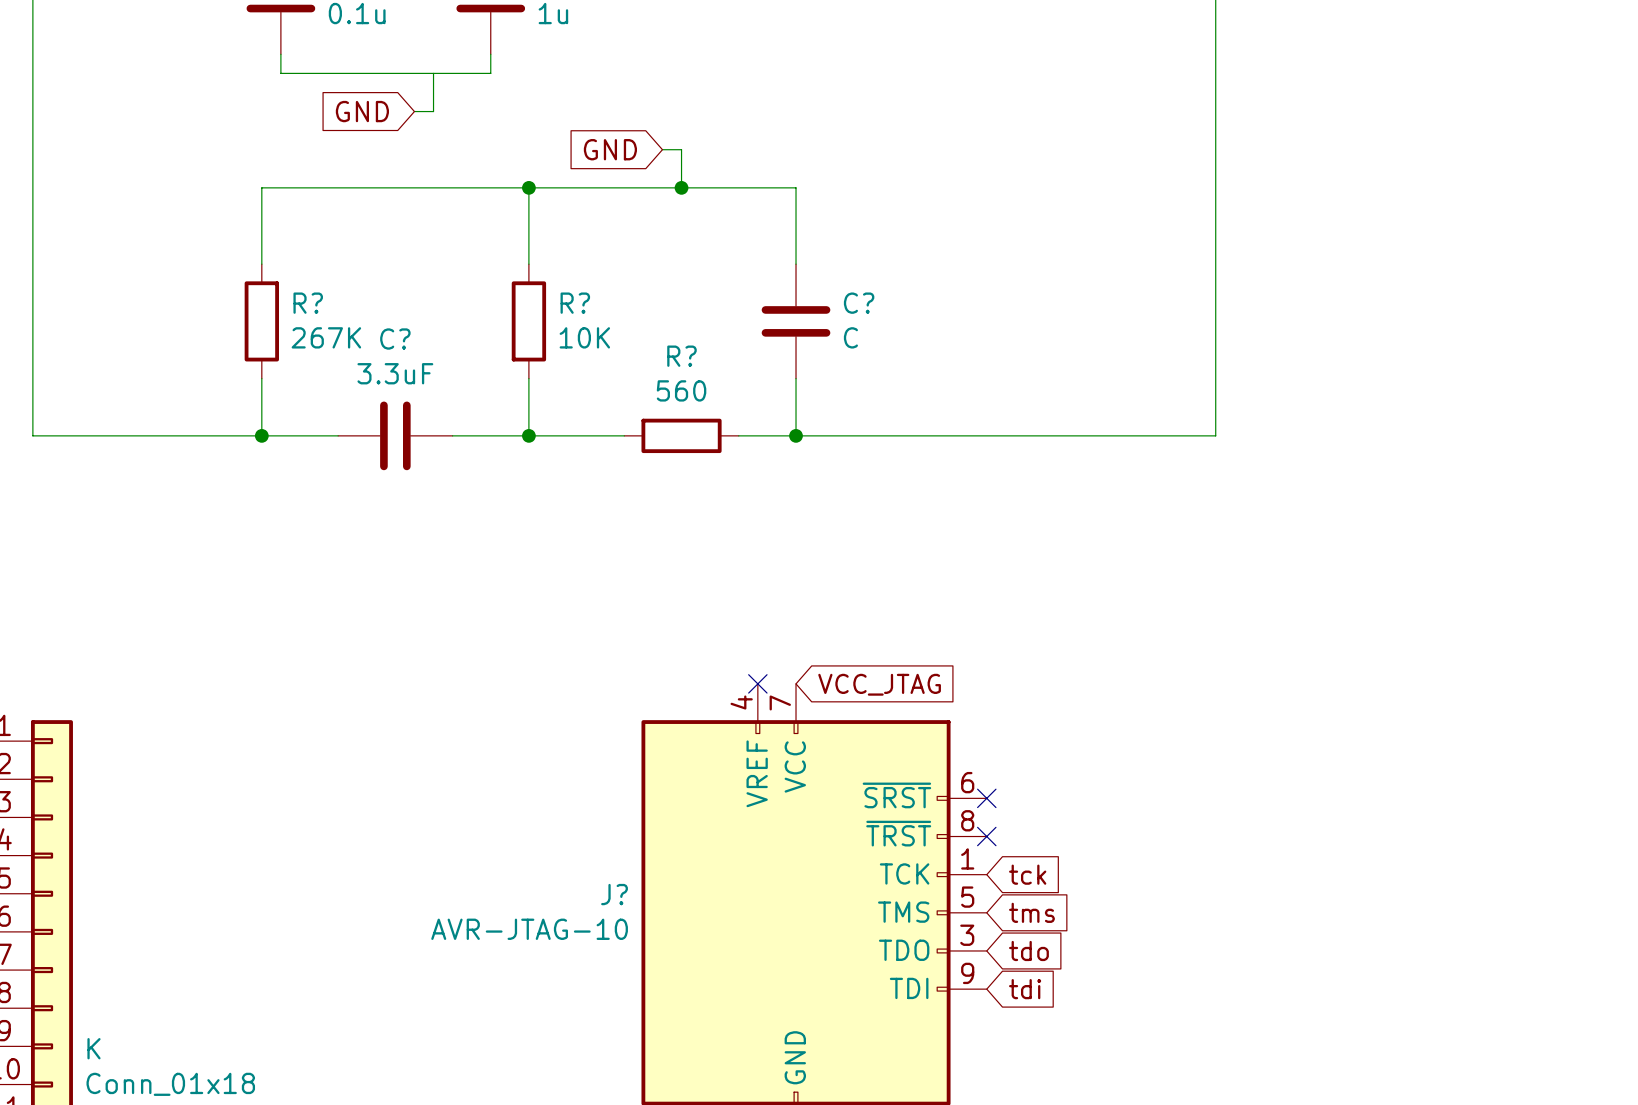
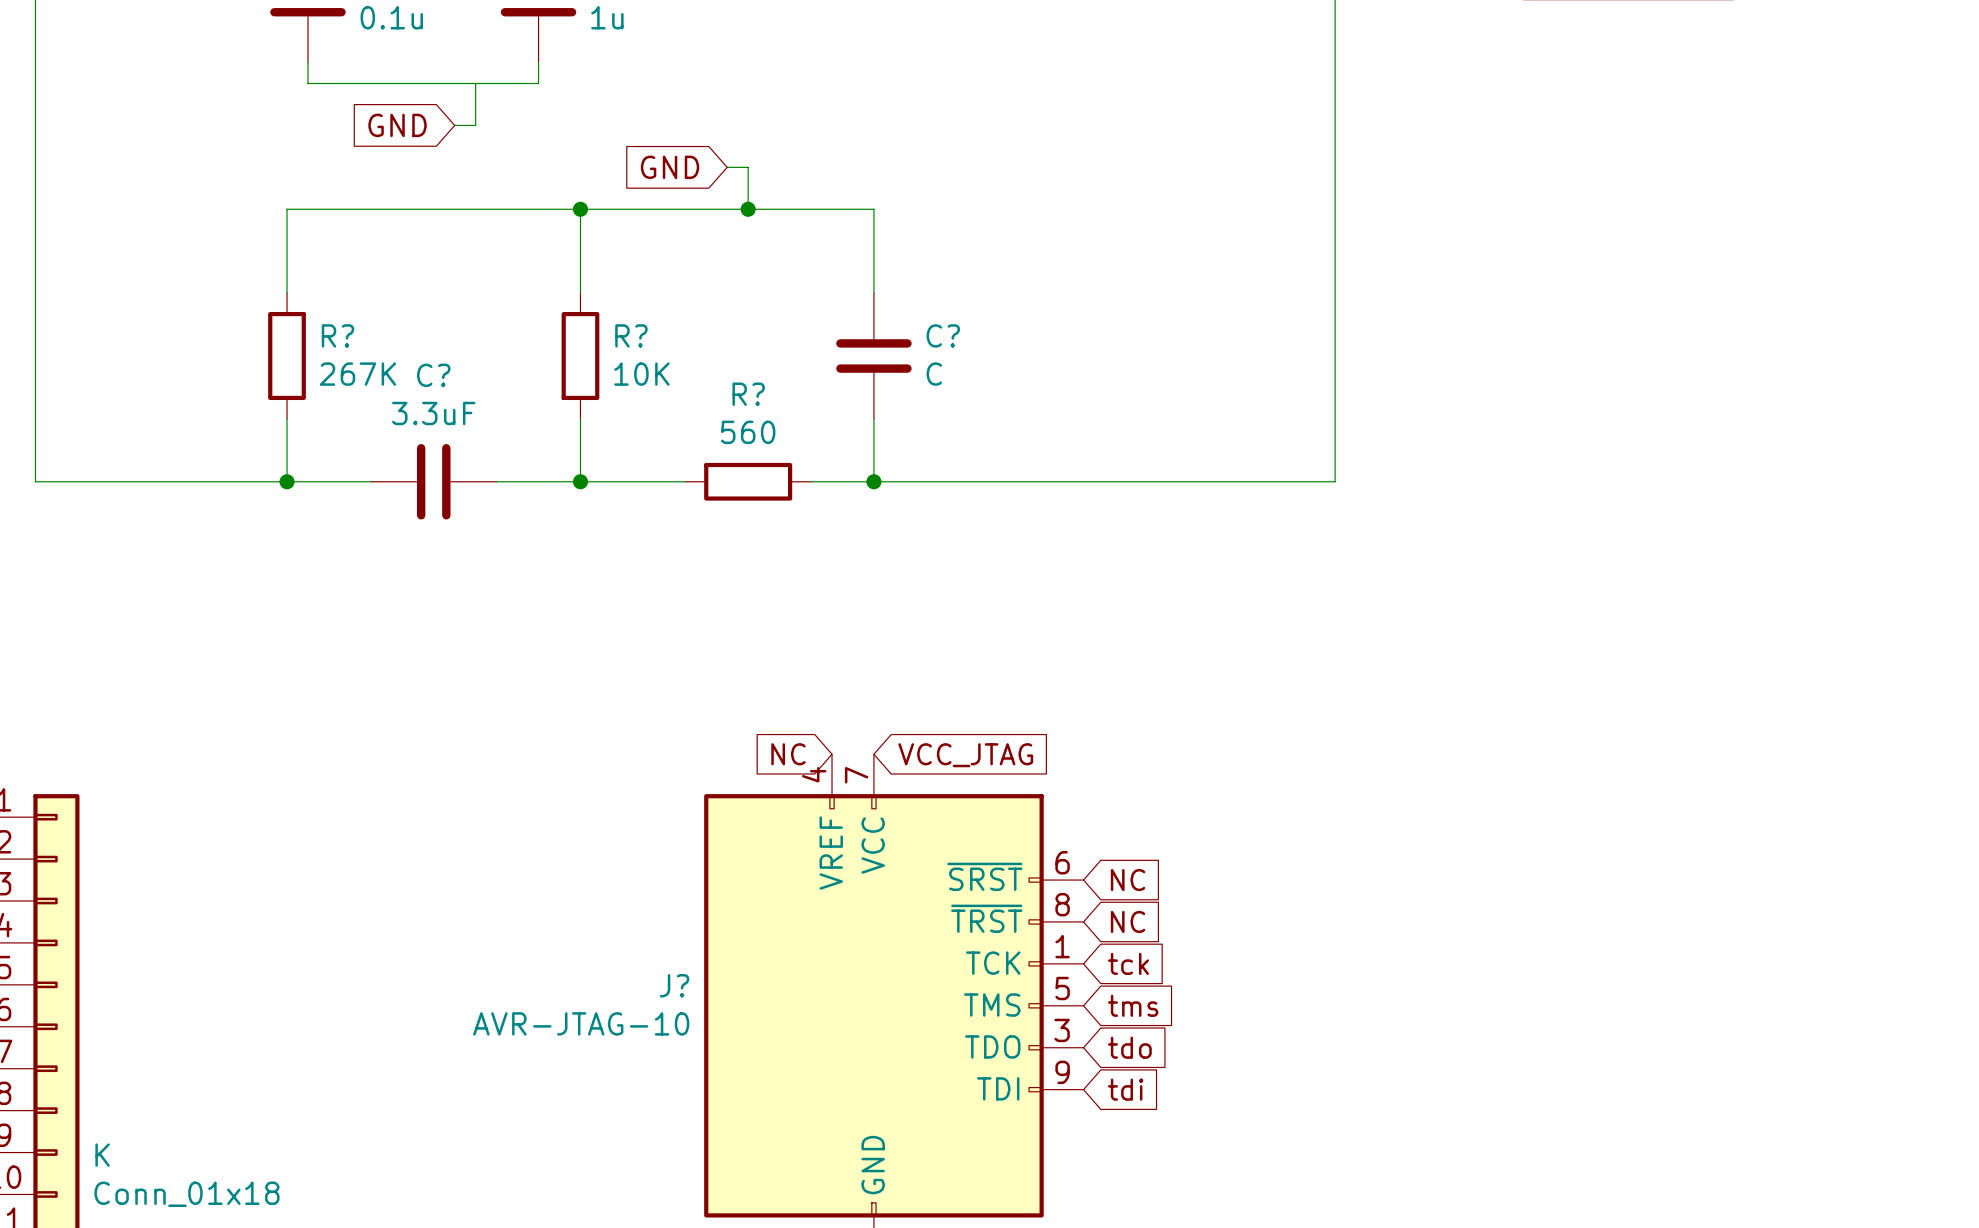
global label: none -> NC (788, 754)
no-connect mark: (757, 683) -> none
no-connect mark: (986, 798) -> none
global label: none -> NC (1128, 880)
no-connect mark: (986, 836) -> none
global label: none -> NC (1128, 921)

